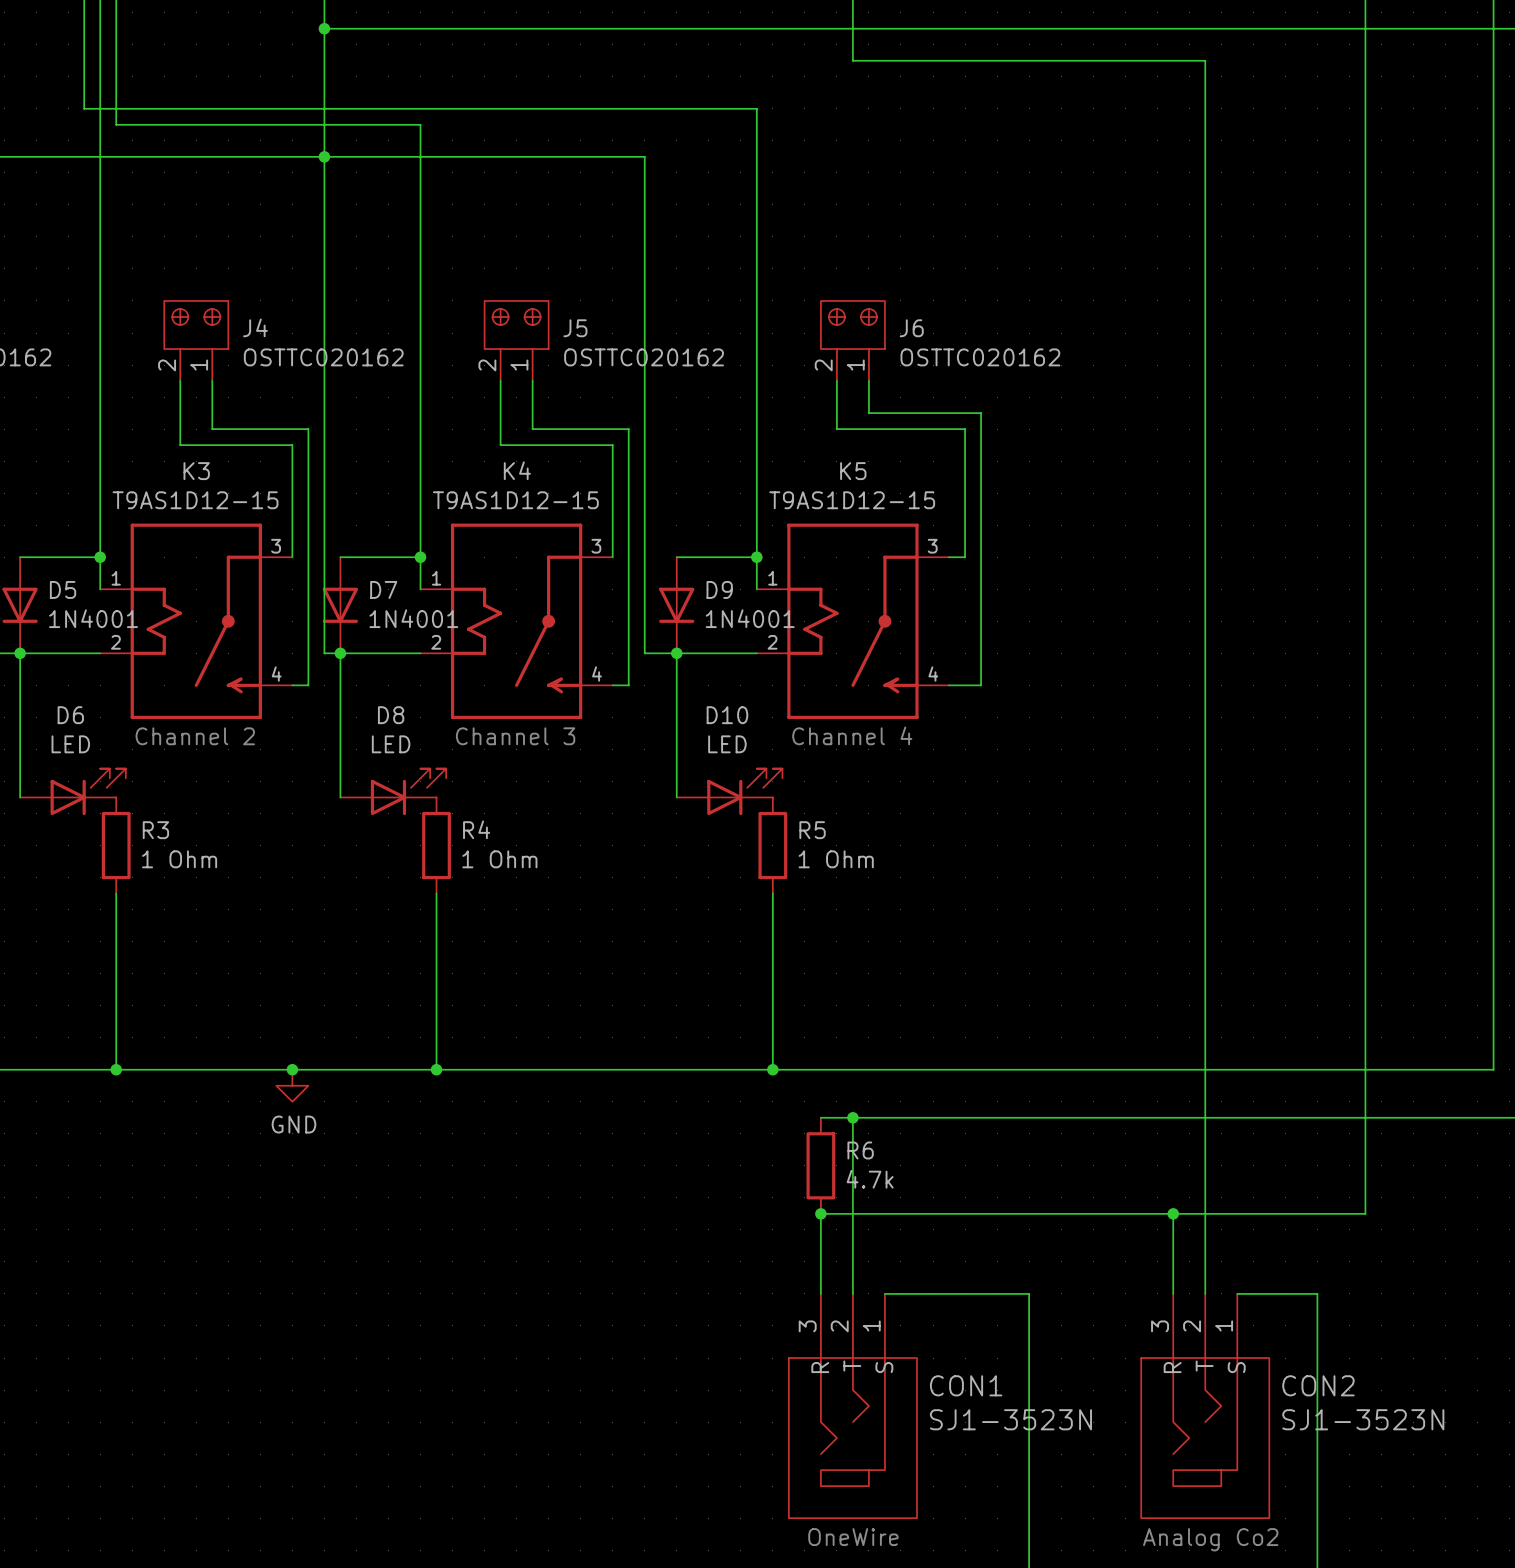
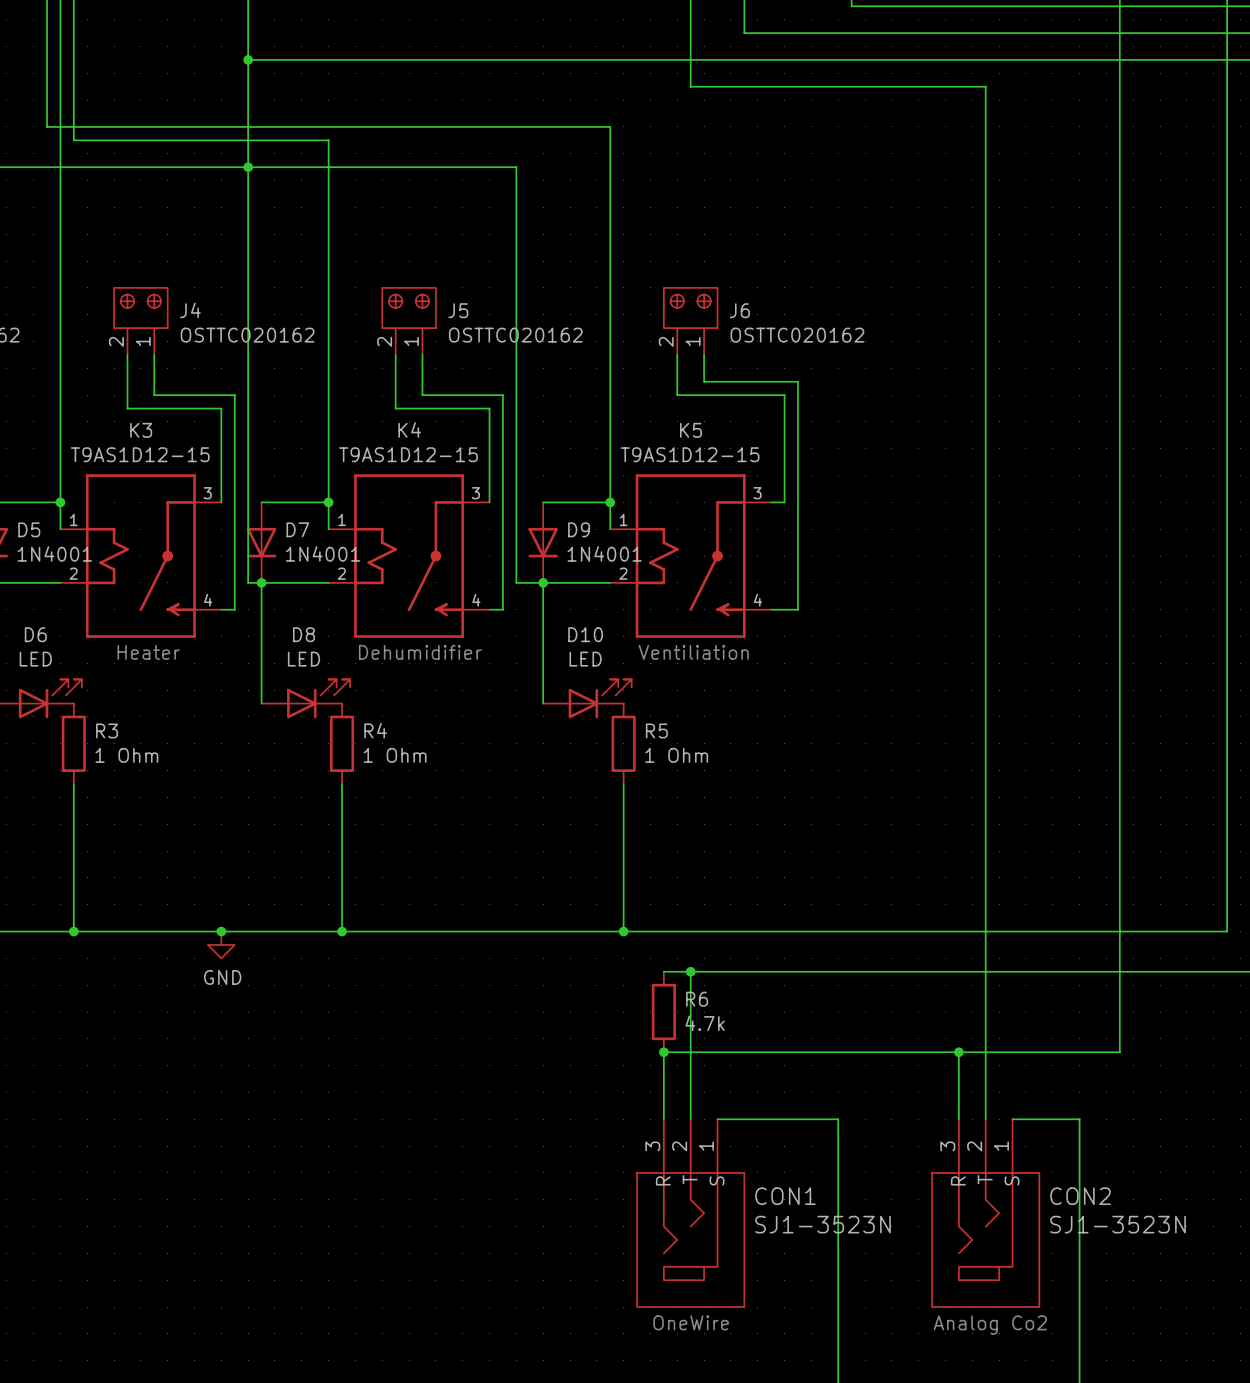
text: Channel 4 (852, 735) -> Ventiliation (693, 652)
text: Channel 2 (195, 736) -> none
text: none -> Heater (148, 652)
text: Channel 3 (515, 736) -> Dehumidifier (420, 652)

